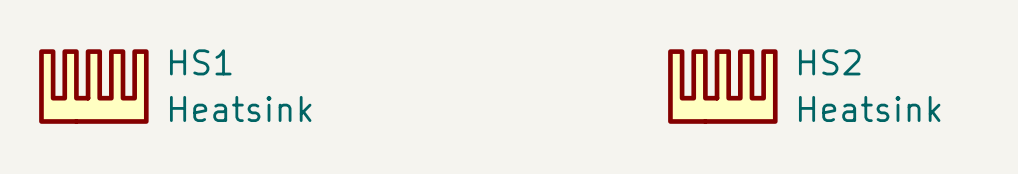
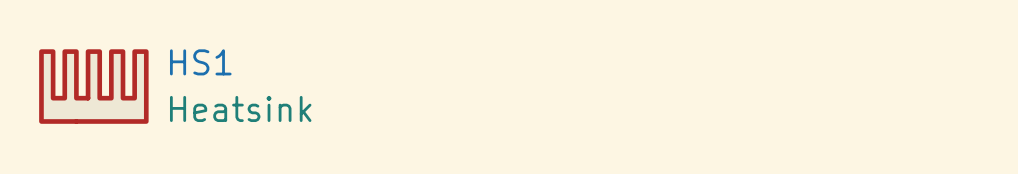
HS2: Heatsink (722, 86) -> none

